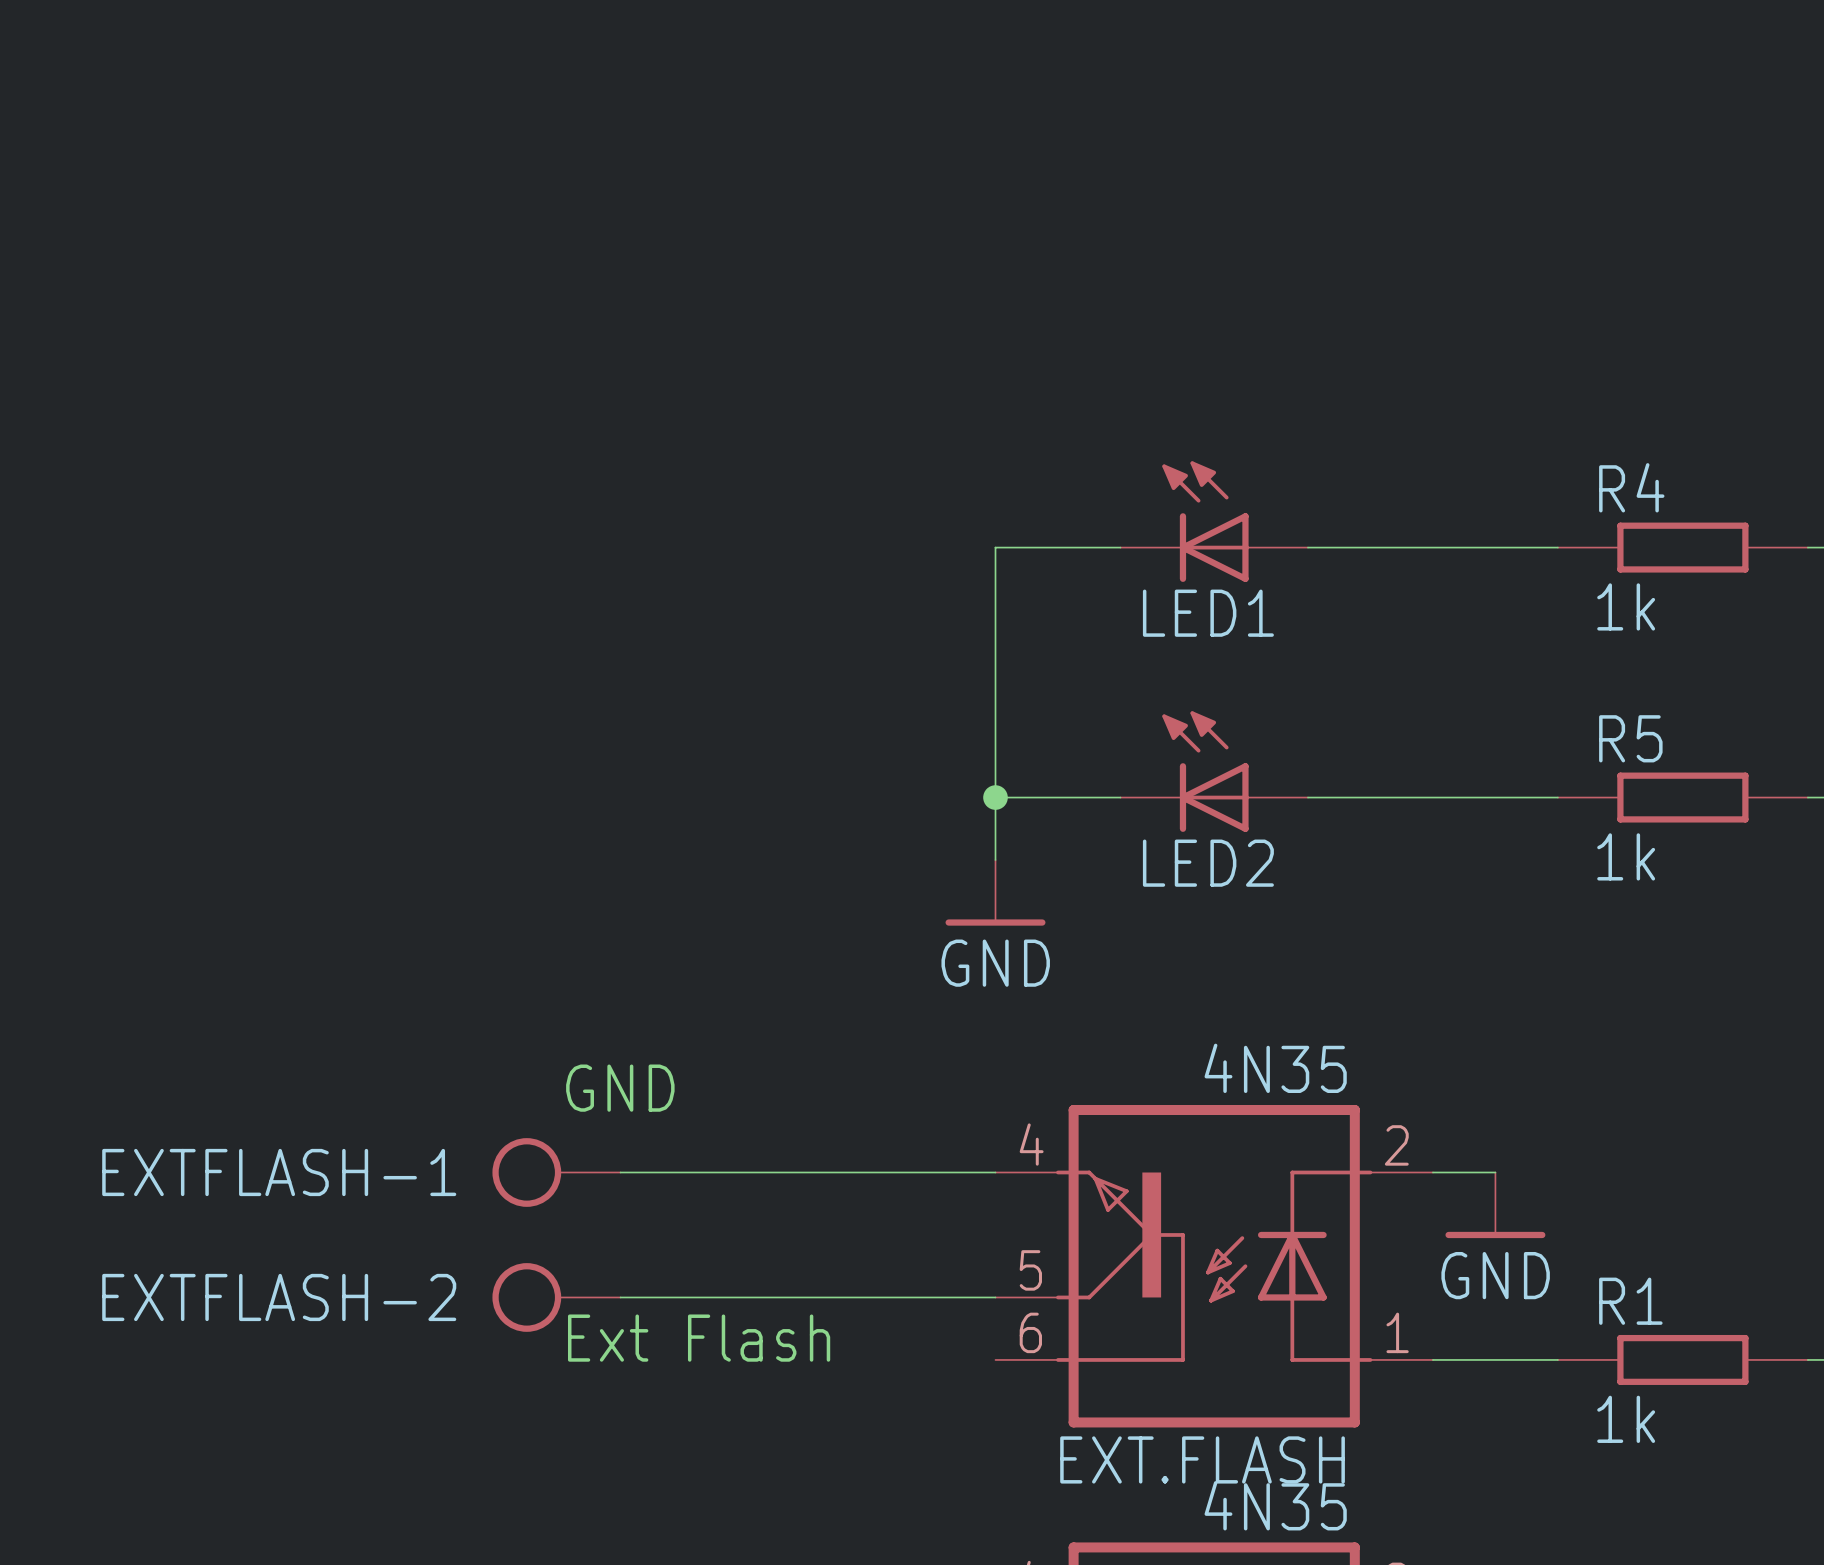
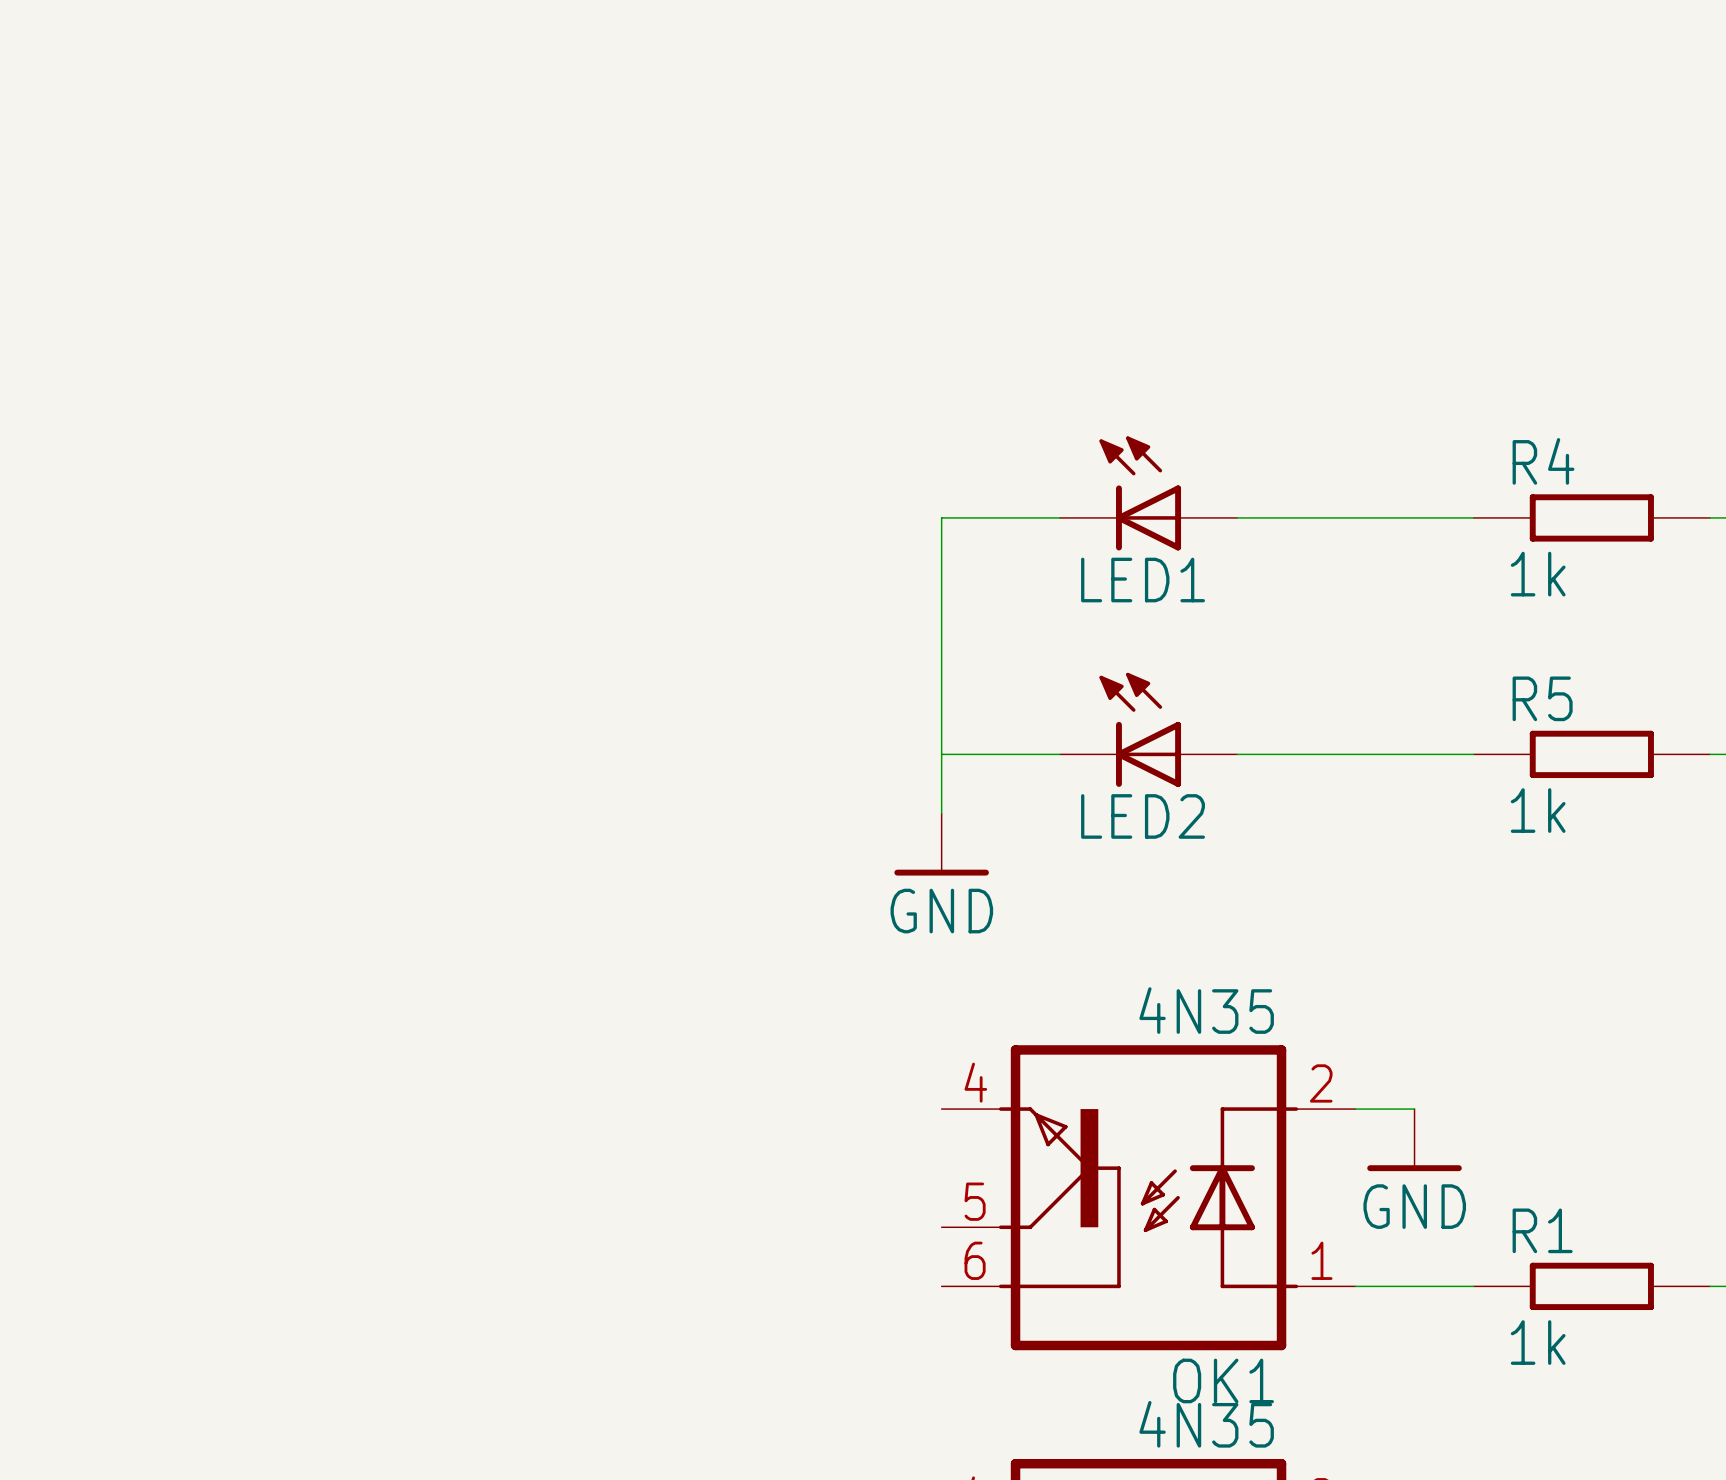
junction: (995, 797) -> none
text: GND (620, 1088) -> none
EXTFLASH-1: (556, 1172) -> none
wire: (620, 1172) (995, 1172) -> none
EXTFLASH-2: (556, 1297) -> none
wire: (620, 1297) (995, 1297) -> none
text: Ext Flash (699, 1338) -> none
EXT.FLASH name: EXT.FLASH (1202, 1459) -> OK1 (1223, 1380)

